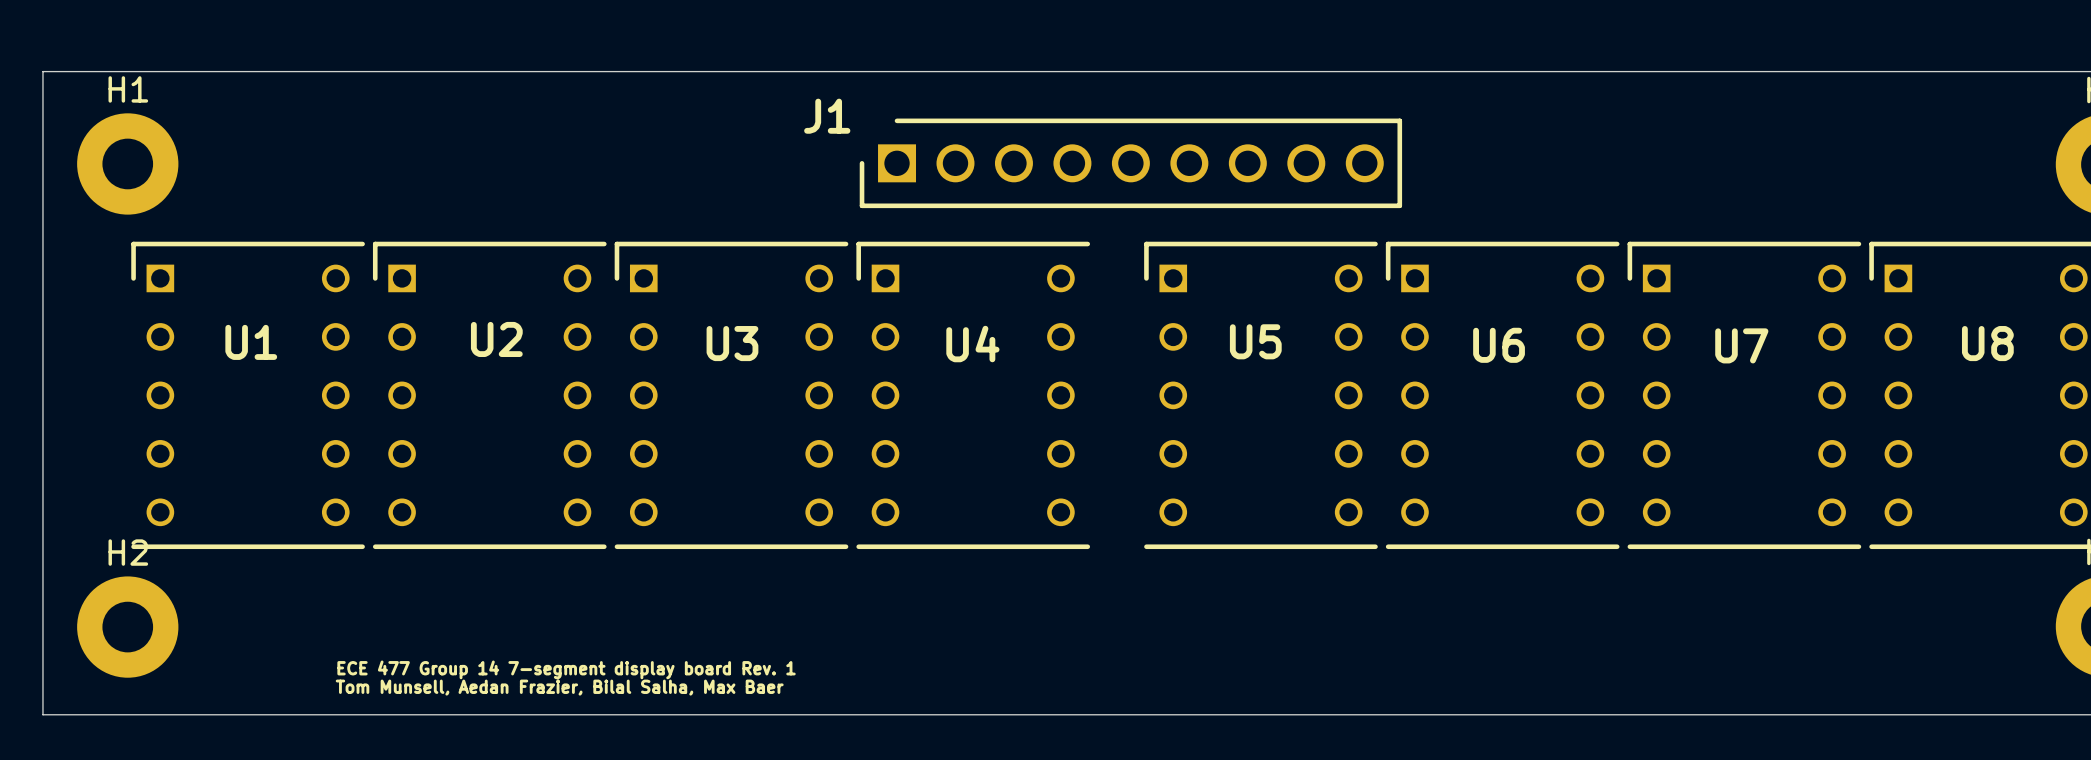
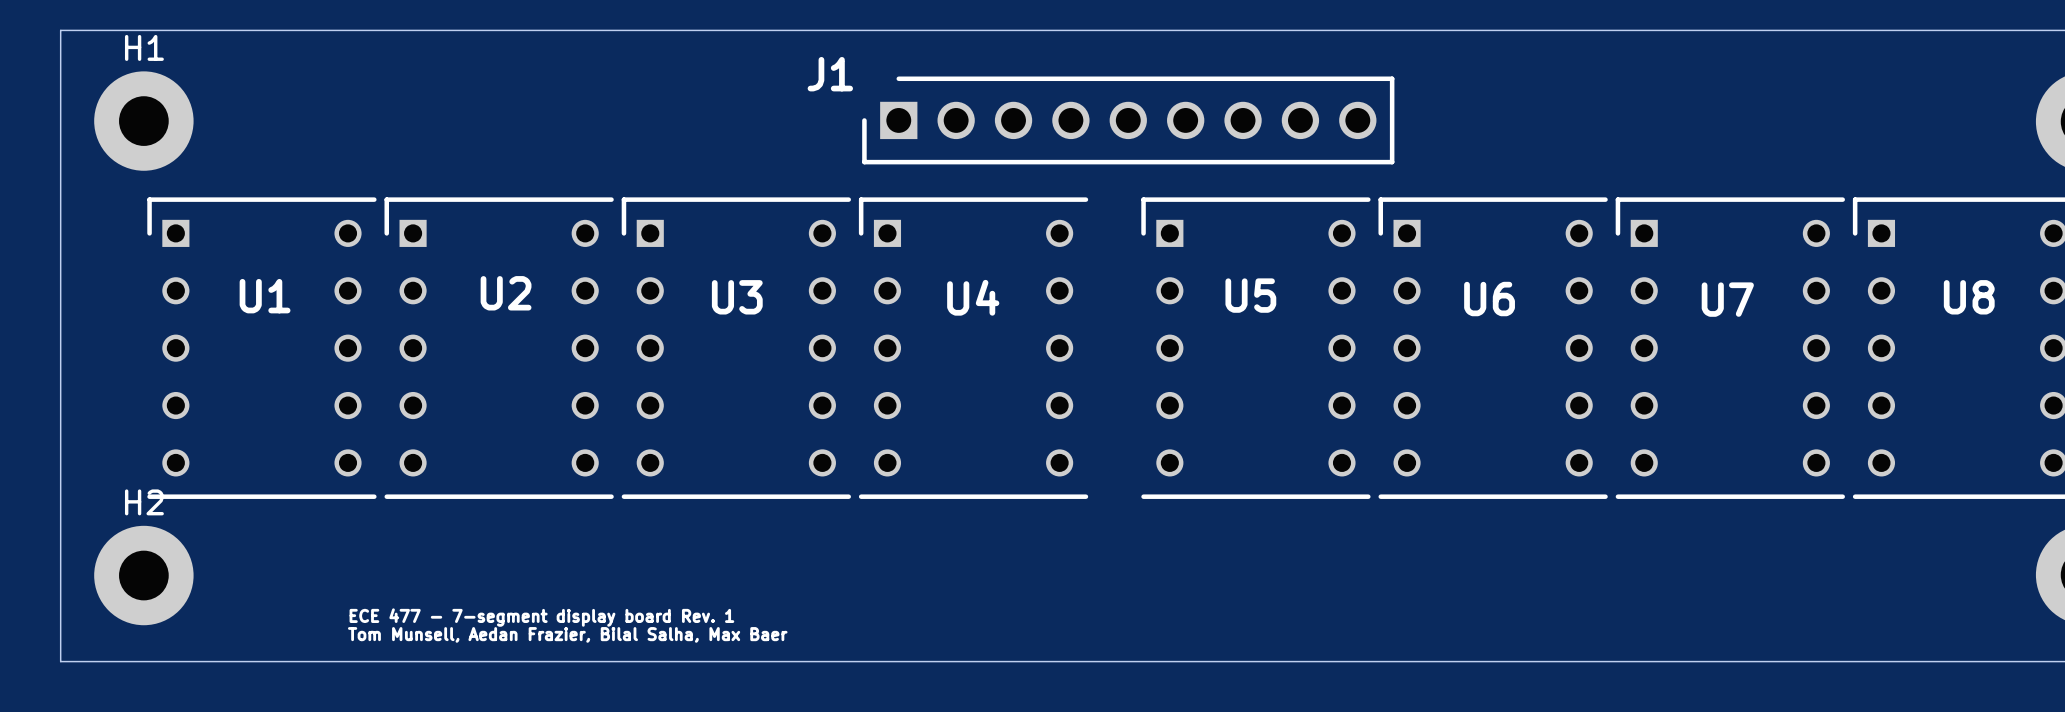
text: ECE 477 Group 14 7-segment display board Rev. 1 (566, 669) -> ECE 477 - 7-segment display board Rev. 1 (541, 617)

